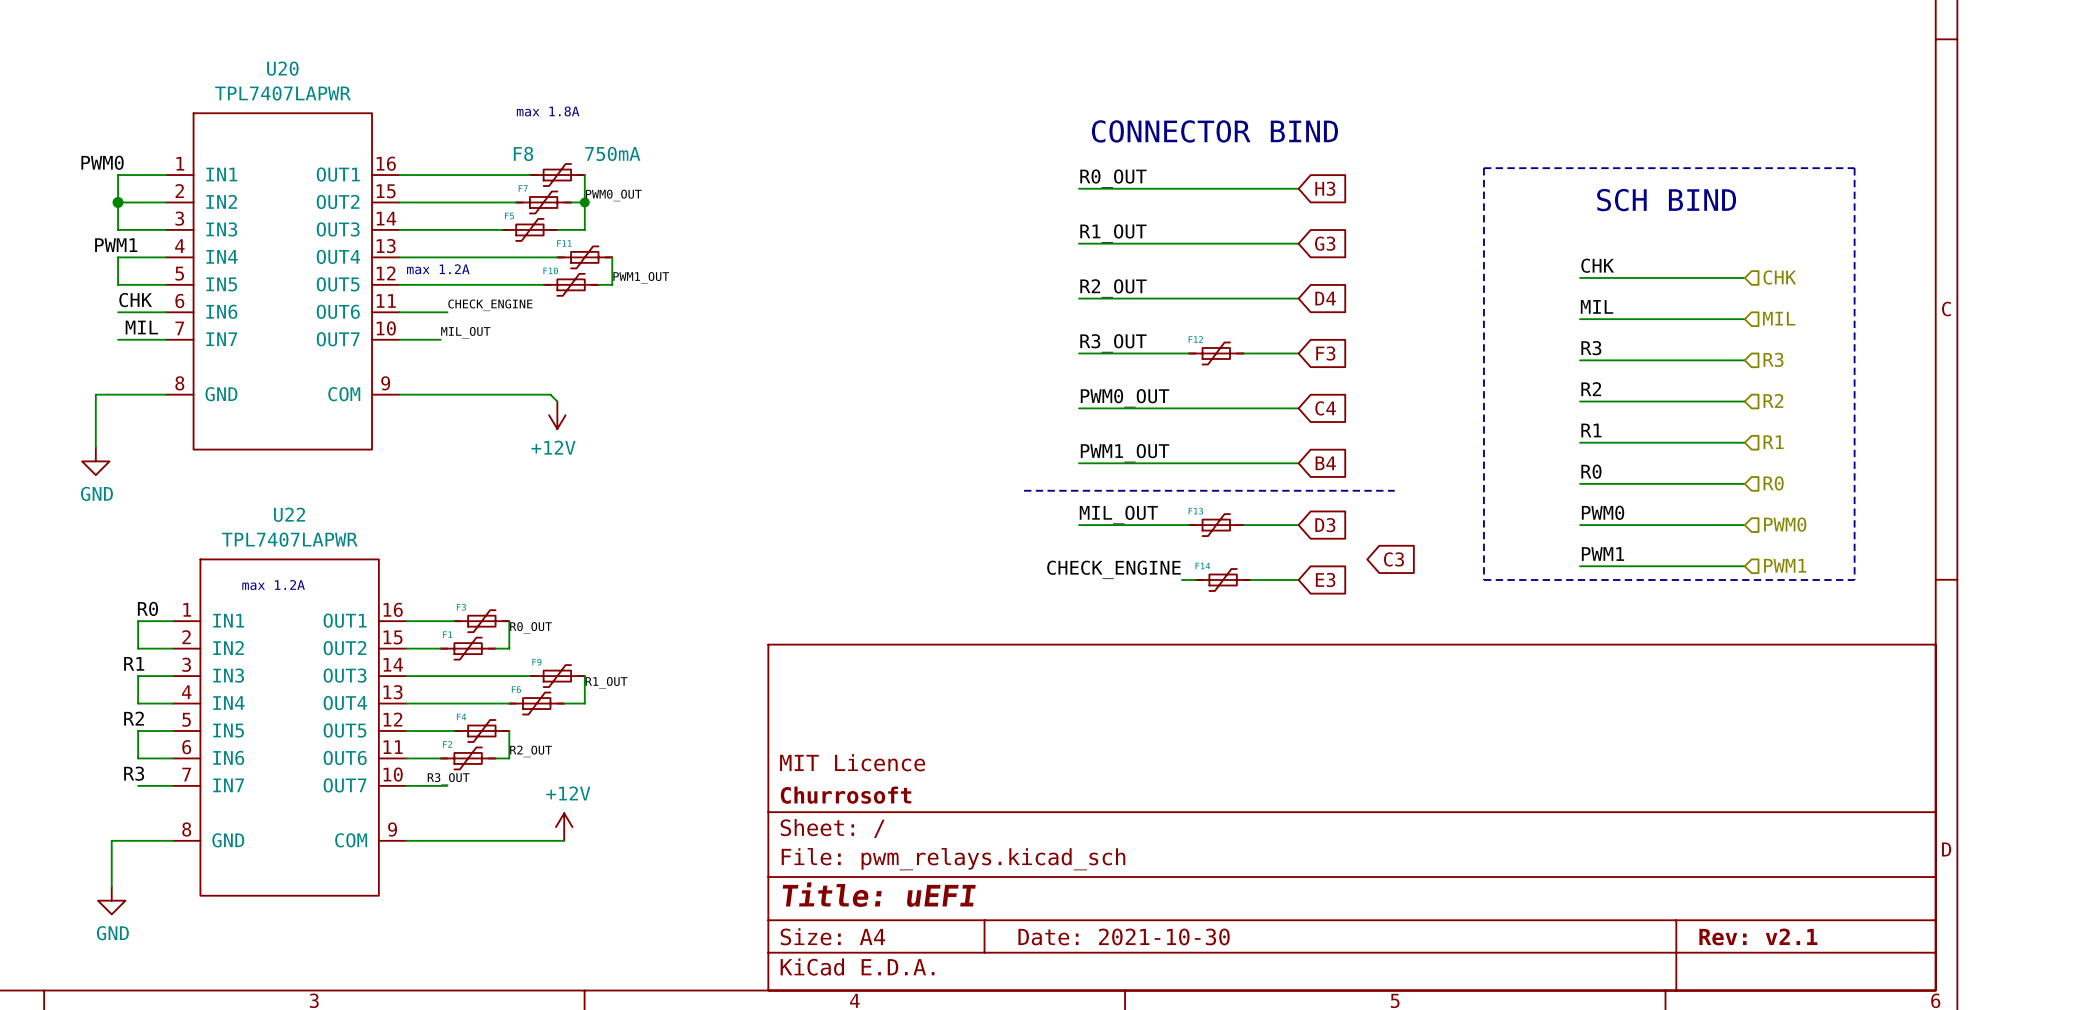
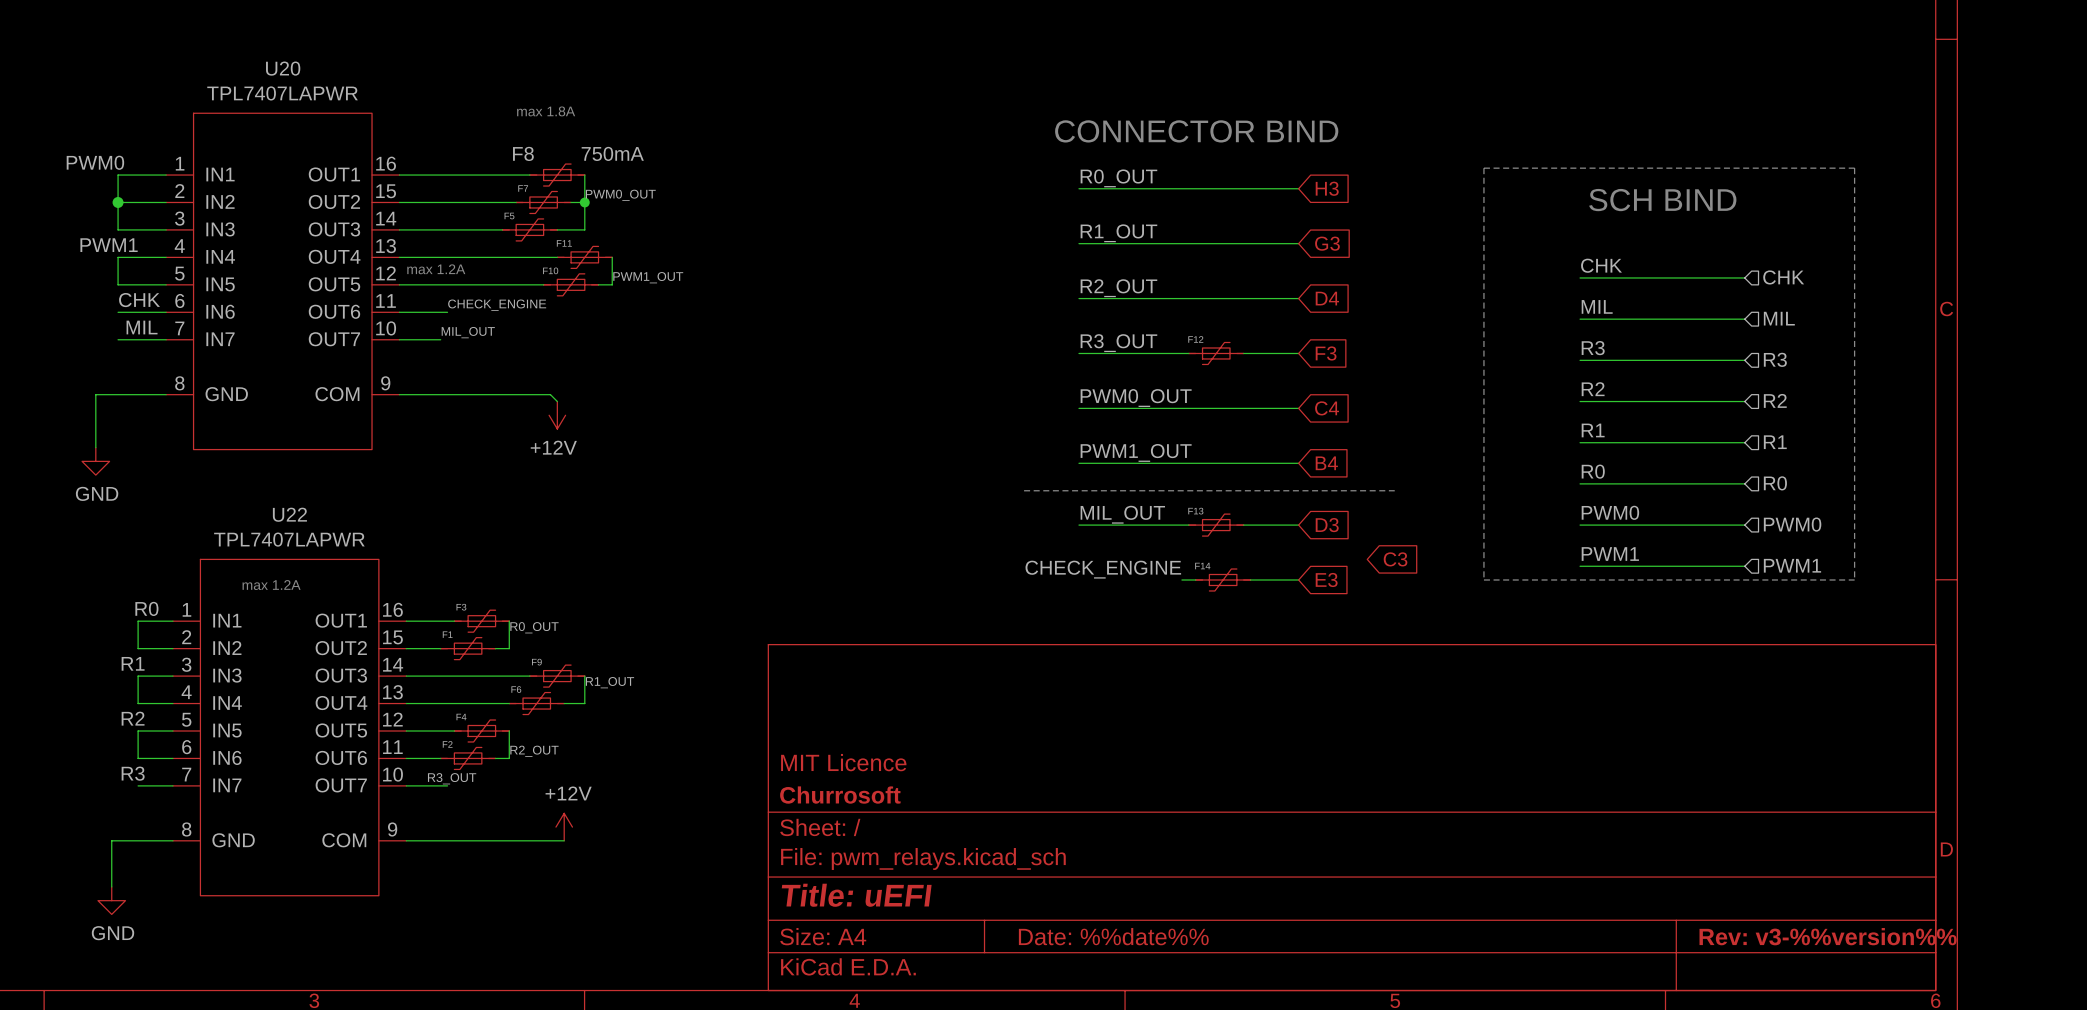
title block: Date: 2021-10-30 (1124, 936) -> Date: %%date%% (1113, 936)
title block: Rev: v2.1 (1758, 936) -> Rev: v3-%%version%% (1828, 936)

